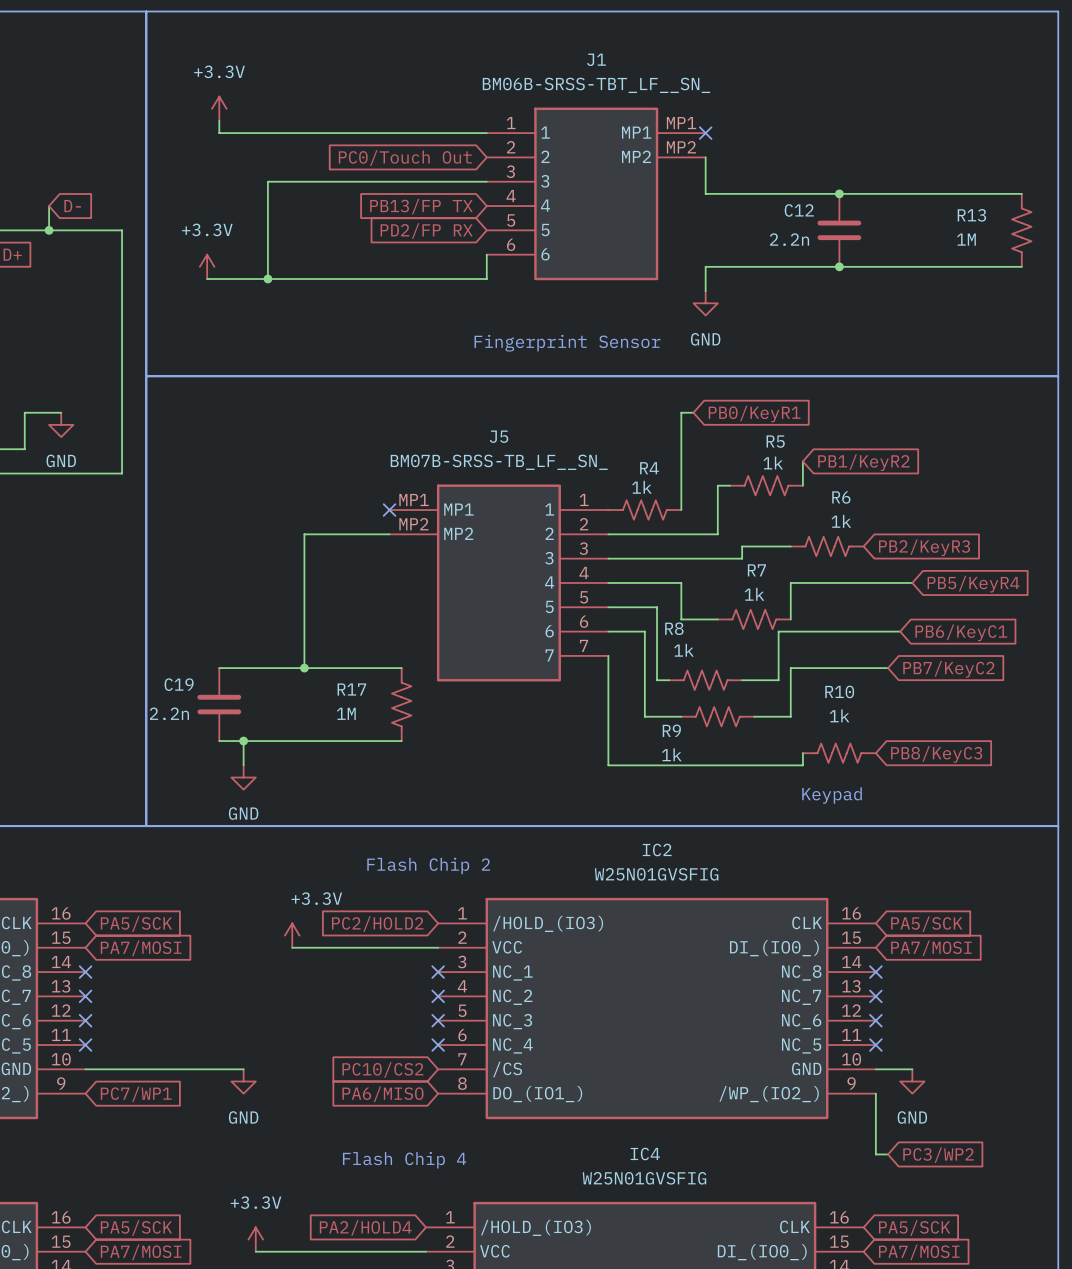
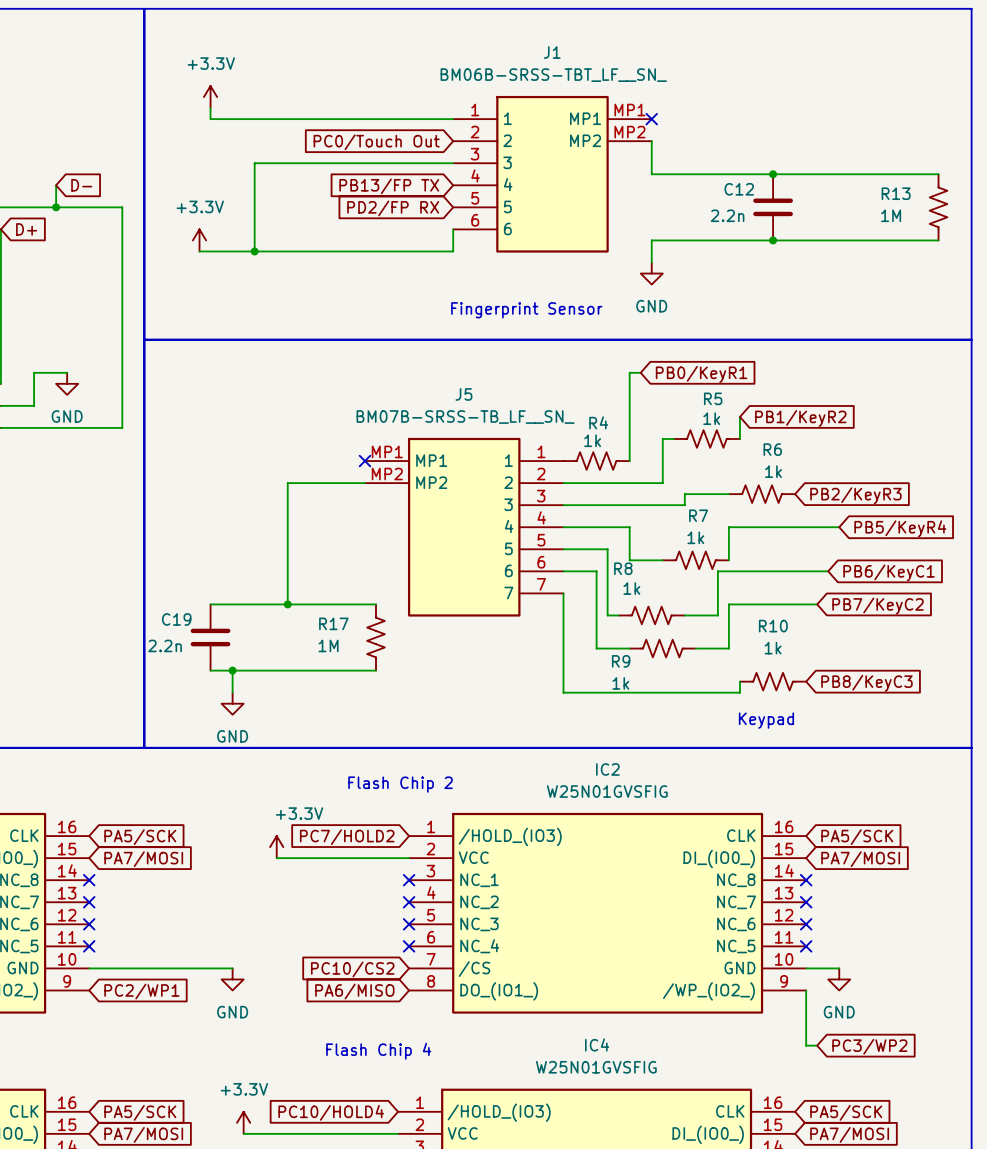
global label: PC2/HOLD2 (377, 924) -> PC7/HOLD2 (347, 837)
global label: PC7/WP1 (136, 1094) -> PC2/WP1 (141, 991)
global label: PA2/HOLD4 (365, 1228) -> PC10/HOLD4 (331, 1112)

